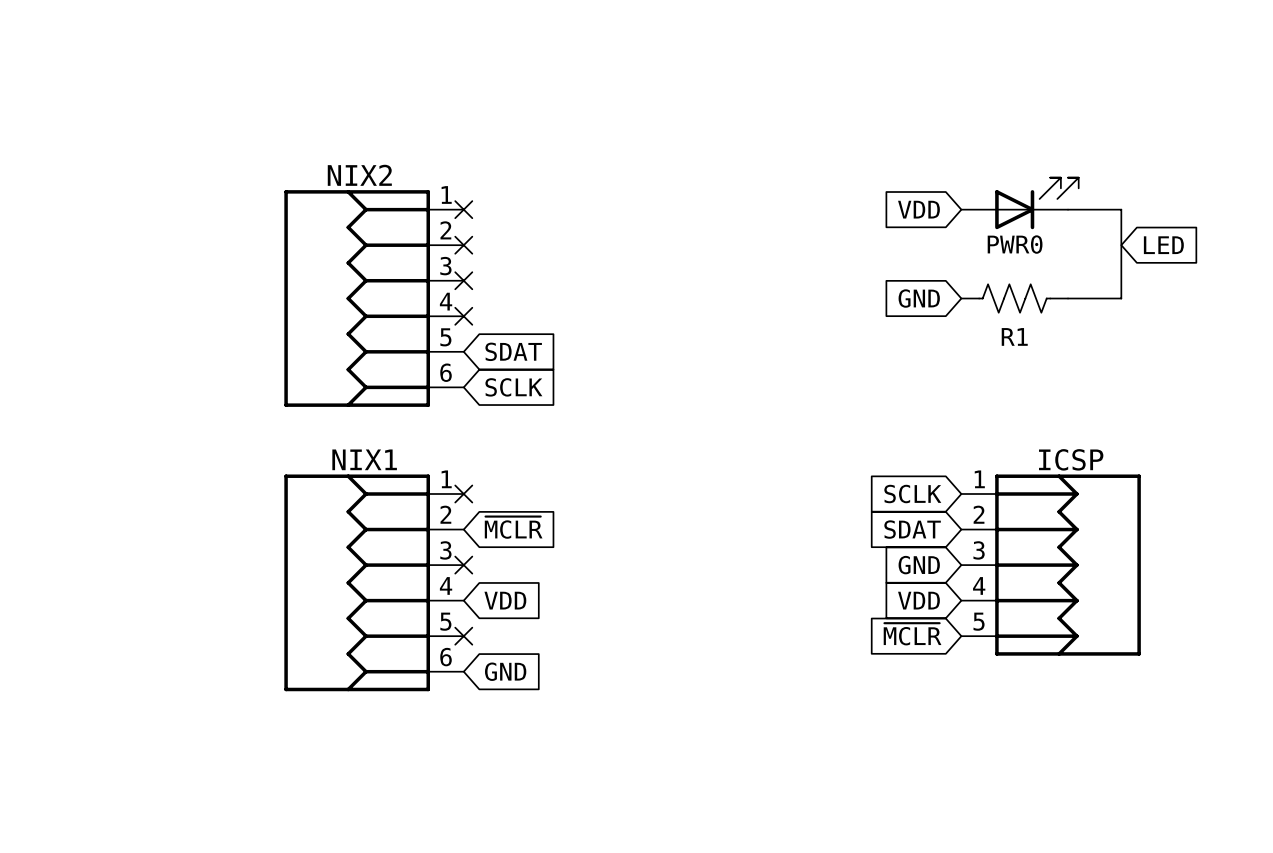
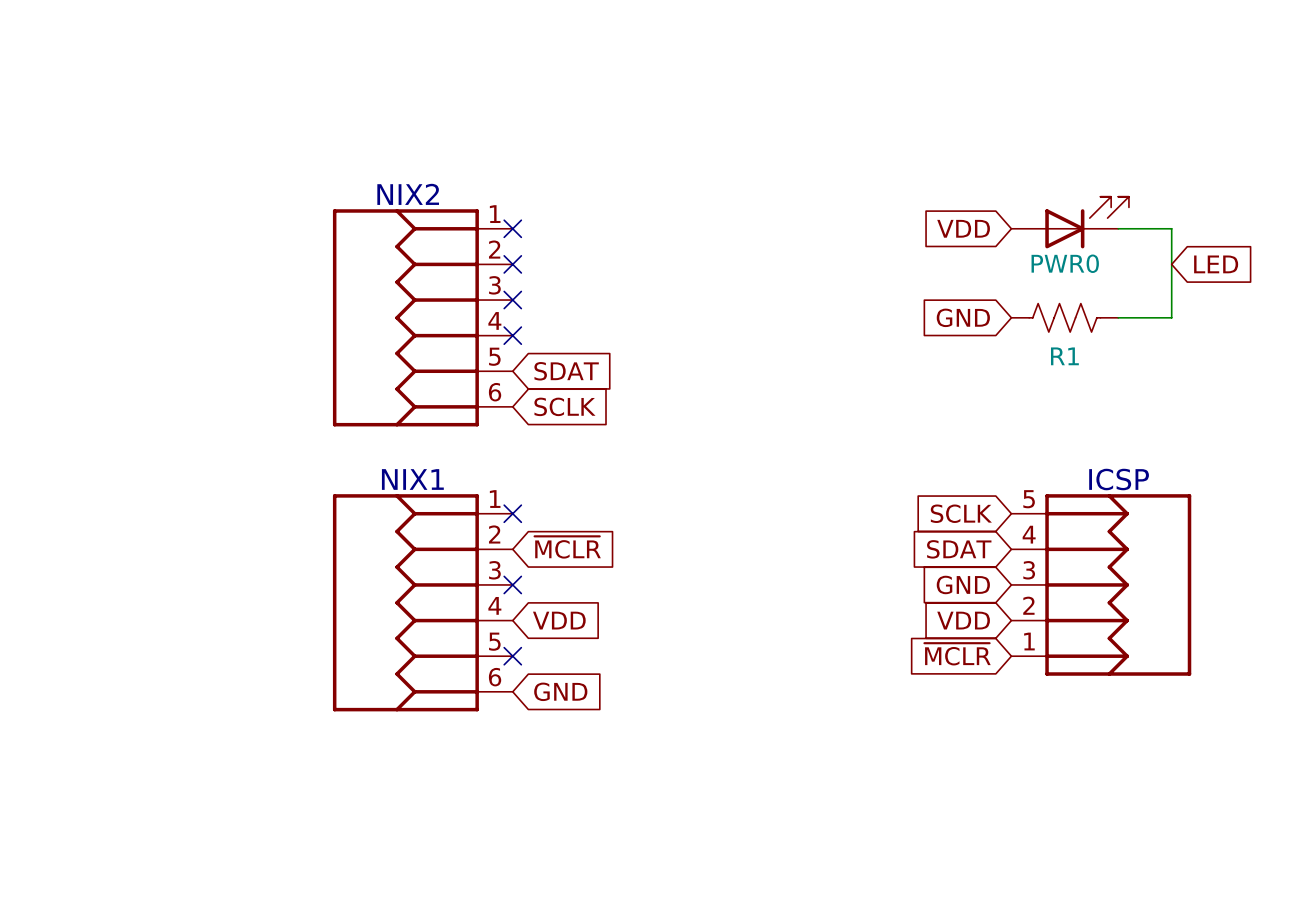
part flip: as is (1068, 565) -> up-down (1118, 584)

